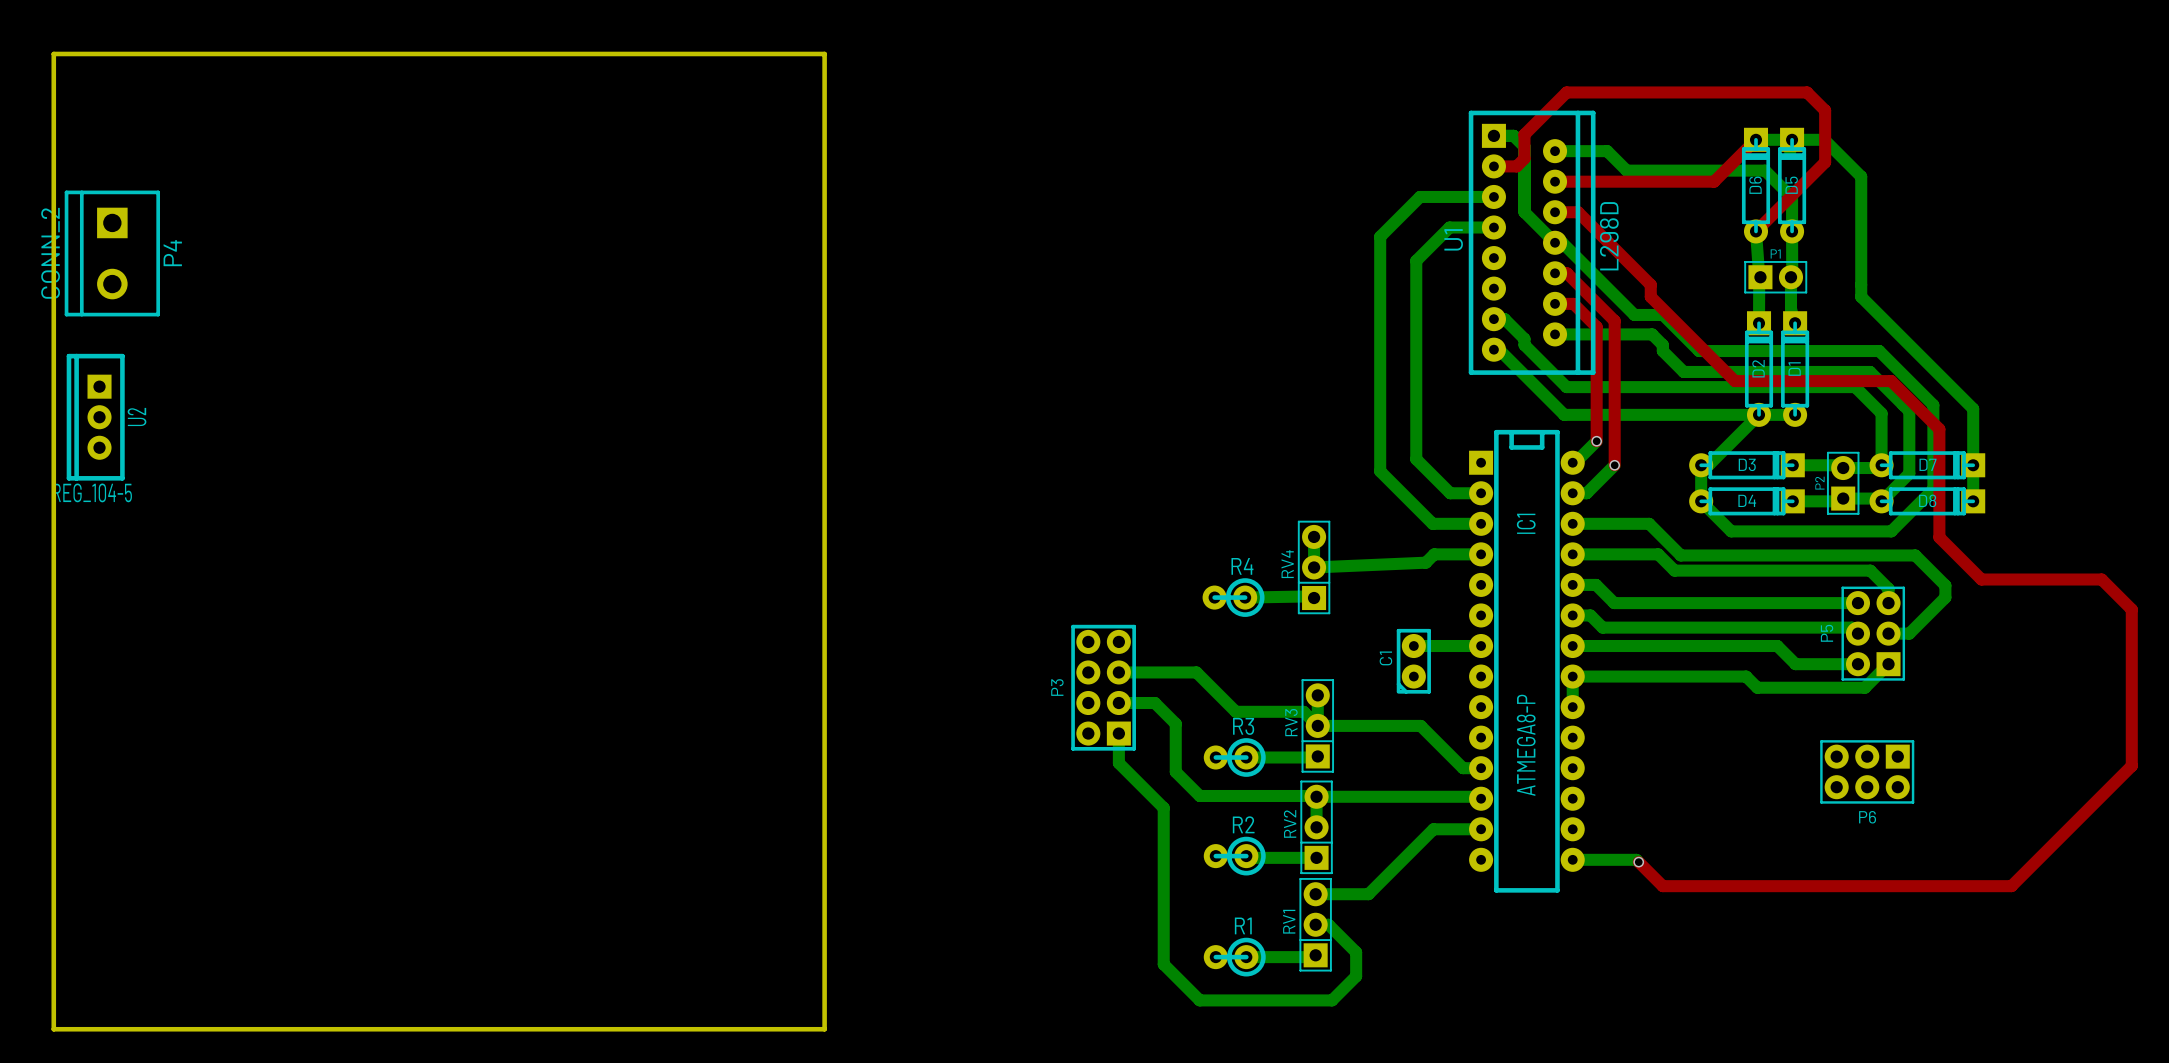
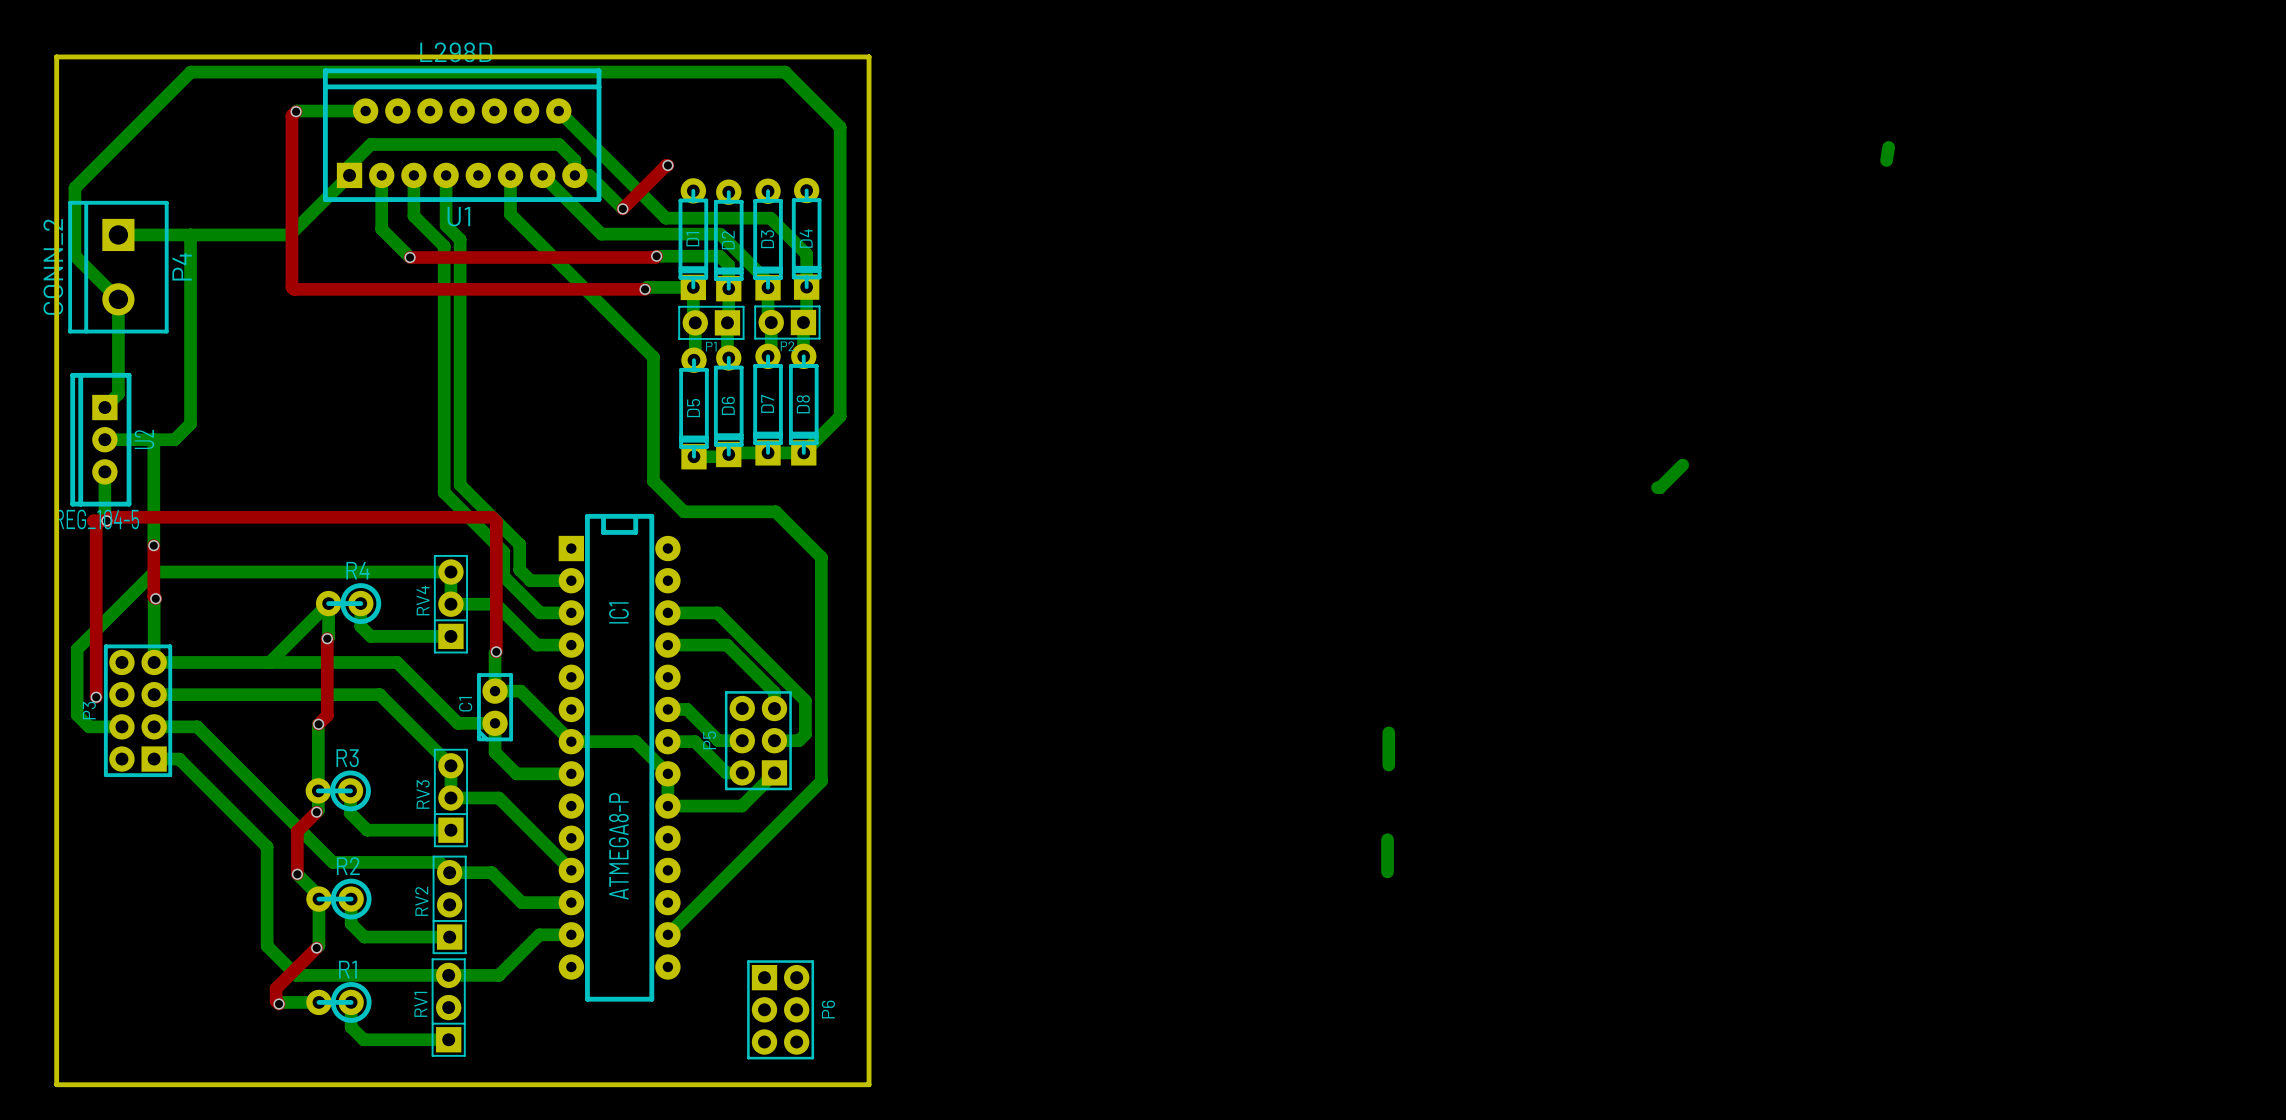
top track: none -> (296, 111) (291, 115) (291, 287) (294, 289) (645, 289)
via: none -> (296, 111)
bottom track: none -> (365, 111) (296, 111)
bottom track: none -> (558, 111) (665, 218) (770, 218) (806, 254) (806, 319) (803, 322) (803, 356)
bottom track: (1493, 135) (1513, 135) (1524, 146) (1524, 212) (1555, 242) (1562, 242) (1634, 314) (1663, 314) (1699, 351) (1879, 351) (1933, 405) (1933, 489) (1891, 531) (1731, 531) (1701, 501) (1701, 465) (1708, 465) (1759, 414) -> none
bottom track: (1755, 139) (1824, 139) (1861, 176) (1861, 296) (1973, 408) (1973, 501) -> none
top track: (1755, 139) (1714, 181) (1555, 181) -> none
bottom track: (1555, 151) (1607, 151) (1626, 170) (1765, 170) (1792, 197) (1791, 309) (1795, 323) -> none
top track: none -> (667, 165) (622, 208)
via: none -> (667, 165)
bottom track: none -> (381, 175) (381, 229) (410, 257)
bottom track: none -> (413, 175) (413, 215) (444, 246) (444, 492) (503, 552) (503, 576) (540, 612) (571, 612)
bottom track: none -> (446, 175) (446, 225) (460, 239) (460, 484) (519, 544) (519, 569) (530, 580) (571, 580)
bottom track: none -> (510, 175) (510, 214) (653, 357) (653, 481) (684, 511) (775, 511) (821, 557) (821, 781) (667, 934)
bottom track: none -> (542, 175) (601, 234) (720, 234) (768, 281) (768, 319) (771, 322) (771, 353) (768, 356)
top track: (1493, 166) (1516, 166) (1524, 158) (1524, 134) (1566, 92) (1807, 92) (1825, 110) (1825, 162) (1755, 231) -> none
D6 rotation: 0° (1755, 185) -> 180° (728, 406)
D6 position: (1755, 185) -> (728, 406)
D5 rotation: 0° (1792, 185) -> 180° (693, 408)
D5 position: (1792, 185) -> (693, 408)
bottom track: (1493, 196) (1420, 196) (1380, 236) (1380, 471) (1432, 523) (1481, 523) -> none
bottom track: none -> (622, 208) (589, 175) (574, 175) (574, 160) (559, 144) (370, 144) (349, 165) (349, 175) (289, 234) (118, 234)
via: none -> (622, 208)
top track: (1555, 212) (1578, 212) (1650, 284) (1650, 296) (1734, 381) (1891, 381) (1939, 429) (1939, 537) (1981, 579) (2101, 579) (2131, 609) (2131, 765) (2011, 886) (1662, 886) (1638, 862) -> none
bottom track: none -> (190, 234) (190, 423) (174, 439) (104, 439)
bottom track: (1493, 227) (1449, 227) (1416, 260) (1416, 459) (1450, 493) (1481, 493) -> none
bottom track: (1755, 231) (1759, 276) (1759, 323) -> none
U1 rotation: 0° (1532, 242) -> 90° counterclockwise (462, 135)
U1 position: (1532, 242) -> (462, 135)
bottom track: none -> (656, 256) (719, 256) (728, 265) (728, 357)
top track: none -> (656, 256) (410, 257)
via: none -> (656, 256)
via: none -> (410, 257)
top track: (1555, 273) (1567, 273) (1614, 320) (1614, 465) -> none
bottom track: none -> (645, 289) (646, 287) (693, 287) (693, 320) (695, 322) (693, 360)
via: none -> (645, 289)
P1 rotation: 0° (1775, 277) -> 180° (711, 322)
P1 position: (1775, 277) -> (711, 322)
top track: (1555, 303) (1573, 303) (1596, 326) (1596, 441) -> none
bottom track: (1493, 319) (1504, 319) (1524, 338) (1524, 345) (1566, 387) (1855, 387) (1881, 413) (1881, 465) (1878, 468) (1843, 468) (1840, 465) (1792, 465) -> none
bottom track: (1555, 334) (1652, 334) (1662, 345) (1662, 351) (1683, 371) (1870, 371) (1909, 411) (1909, 473) (1881, 501) (1878, 498) (1843, 498) (1840, 501) (1792, 501) -> none
bottom track: (1493, 349) (1499, 349) (1564, 414) (1795, 414) -> none
D2 rotation: 0° (1759, 369) -> 180° (728, 240)
D2 position: (1759, 369) -> (728, 240)
D1 rotation: 0° (1795, 369) -> 180° (693, 239)
D1 position: (1795, 369) -> (693, 239)
bottom track: none -> (104, 407) (118, 394) (118, 299) (74, 255) (74, 187) (190, 72) (785, 72) (840, 127) (840, 416) (803, 452) (730, 452) (726, 456) (693, 456)
bottom track: none -> (153, 439) (153, 545)
via: (1596, 441) -> none
bottom track: none -> (104, 471) (104, 518) (106, 520)
bottom track: (1614, 465) (1586, 493) (1572, 493) -> none
via: (1614, 465) -> none
D3 rotation: 0° (1746, 465) -> 90° clockwise (768, 239)
D3 position: (1746, 465) -> (768, 239)
D7 rotation: 0° (1927, 465) -> 90° clockwise (768, 404)
D7 position: (1927, 465) -> (768, 404)
P2 rotation: 0° (1843, 483) -> 90° counterclockwise (787, 322)
P2 position: (1843, 483) -> (787, 322)
via: none -> (106, 520)
D4 rotation: 0° (1746, 501) -> 90° clockwise (806, 238)
D4 position: (1746, 501) -> (806, 238)
D8 rotation: 0° (1927, 501) -> 90° clockwise (803, 404)
D8 position: (1927, 501) -> (803, 404)
top track: none -> (153, 545) (153, 596) (155, 598)
via: none -> (153, 545)
bottom track: (1572, 523) (1649, 523) (1680, 555) (1915, 555) (1945, 585) (1945, 597) (1909, 633) (1888, 633) -> none
bottom track: (1314, 536) (1314, 567) (1425, 562) (1434, 554) (1481, 554) -> none
bottom track: (1572, 554) (1658, 554) (1674, 570) (1870, 570) (1888, 588) (1888, 603) -> none
RV4 position: (1314, 567) -> (450, 604)
bottom track: none -> (155, 598) (154, 600) (154, 662) (397, 662) (458, 723) (495, 723) (495, 752) (516, 773) (571, 773)
via: none -> (155, 598)
bottom track: none -> (360, 603) (360, 626) (370, 636) (450, 636)
bottom track: none -> (667, 612) (717, 612) (805, 700) (805, 734) (798, 740) (774, 740)
bottom track: (1572, 584) (1596, 584) (1614, 603) (1857, 603) -> none
R4 position: (1233, 597) -> (348, 603)
bottom track: (1245, 597) (1314, 596) (1314, 598) -> none
bottom track: none -> (327, 638) (328, 603) (269, 662)
top track: none -> (327, 638) (327, 715) (318, 724)
via: none -> (327, 638)
bottom track: none -> (571, 645) (536, 645) (496, 604) (450, 604) (450, 572) (154, 572) (77, 649) (77, 714) (89, 726) (121, 726)
bottom track: none -> (667, 645) (727, 645) (774, 692) (774, 708)
bottom track: (1572, 615) (1590, 615) (1602, 627) (1851, 627) (1857, 633) -> none
bottom track: none -> (496, 651) (495, 691) (520, 691) (571, 741) (635, 741) (667, 773) (667, 806) (741, 806) (774, 772)
top track: none -> (496, 651) (496, 521) (492, 517) (110, 517) (106, 520) (93, 520) (96, 523) (96, 697)
via: none -> (496, 651)
P5 position: (1873, 633) -> (758, 740)
bottom track: (1413, 646) (1481, 646) -> none
bottom track: (1572, 646) (1777, 646) (1795, 664) (1857, 664) -> none
bottom track: none -> (154, 694) (379, 694) (450, 765) (450, 798) (498, 798) (571, 870)
via: none -> (96, 697)
C1 position: (1413, 661) -> (495, 707)
IC1 position: (1526, 661) -> (619, 757)
bottom track: (1888, 664) (1864, 687) (1757, 687) (1746, 676) (1572, 676) (1572, 707) -> none
bottom track: (1118, 672) (1196, 672) (1235, 711) (1303, 711) (1317, 725) (1420, 725) (1463, 768) (1481, 768) -> none
bottom track: none -> (667, 709) (687, 709) (718, 740) (742, 740)
bottom track: none -> (318, 724) (318, 810) (316, 812)
via: none -> (318, 724)
P3 position: (1103, 687) -> (138, 710)
bottom track: none -> (154, 726) (197, 726) (332, 862) (439, 862) (449, 872) (491, 872) (521, 902) (571, 902)
bottom track: none -> (667, 741) (694, 741) (726, 772) (742, 772)
bottom track: (1118, 703) (1154, 703) (1175, 723) (1175, 771) (1199, 795) (1479, 796) (1481, 798) -> none
bottom track: none -> (154, 759) (179, 759) (267, 846) (267, 946) (296, 975) (498, 975) (539, 934) (571, 934)
RV3 position: (1317, 725) -> (450, 798)
bottom track: (1118, 733) (1118, 763) (1163, 807) (1163, 964) (1199, 1000) (1332, 1000) (1356, 976) (1356, 952) (1328, 924) (1315, 924) -> none
bottom track: none -> (350, 790) (350, 813) (367, 830) (450, 830)
bottom track: (1317, 756) (1246, 757) -> none
R3 position: (1234, 757) -> (338, 790)
top track: none -> (316, 812) (297, 831) (297, 874)
via: none -> (316, 812)
P6 rotation: 0° (1867, 771) -> 90° counterclockwise (780, 1009)
P6 position: (1867, 771) -> (780, 1009)
RV2 position: (1316, 827) -> (449, 904)
bottom track: none -> (297, 874) (318, 895) (318, 945) (316, 948)
via: none -> (297, 874)
bottom track: (1481, 829) (1433, 829) (1368, 894) (1315, 894) -> none
bottom track: none -> (351, 899) (351, 923) (364, 937) (449, 937)
R2 position: (1234, 856) -> (338, 899)
bottom track: (1246, 856) (1248, 857) (1316, 857) -> none
bottom track: (1572, 859) (1636, 859) (1638, 862) -> none
via: (1638, 862) -> none
top track: none -> (316, 948) (276, 988) (276, 1001) (279, 1004)
via: none -> (316, 948)
RV1 position: (1315, 924) -> (448, 1007)
bottom track: none -> (318, 1002) (280, 1002) (279, 1004)
bottom track: none -> (351, 1002) (351, 1027) (363, 1039) (448, 1039)
via: none -> (279, 1004)
bottom track: (1315, 955) (1313, 957) (1246, 957) -> none
R1 position: (1234, 957) -> (338, 1002)

